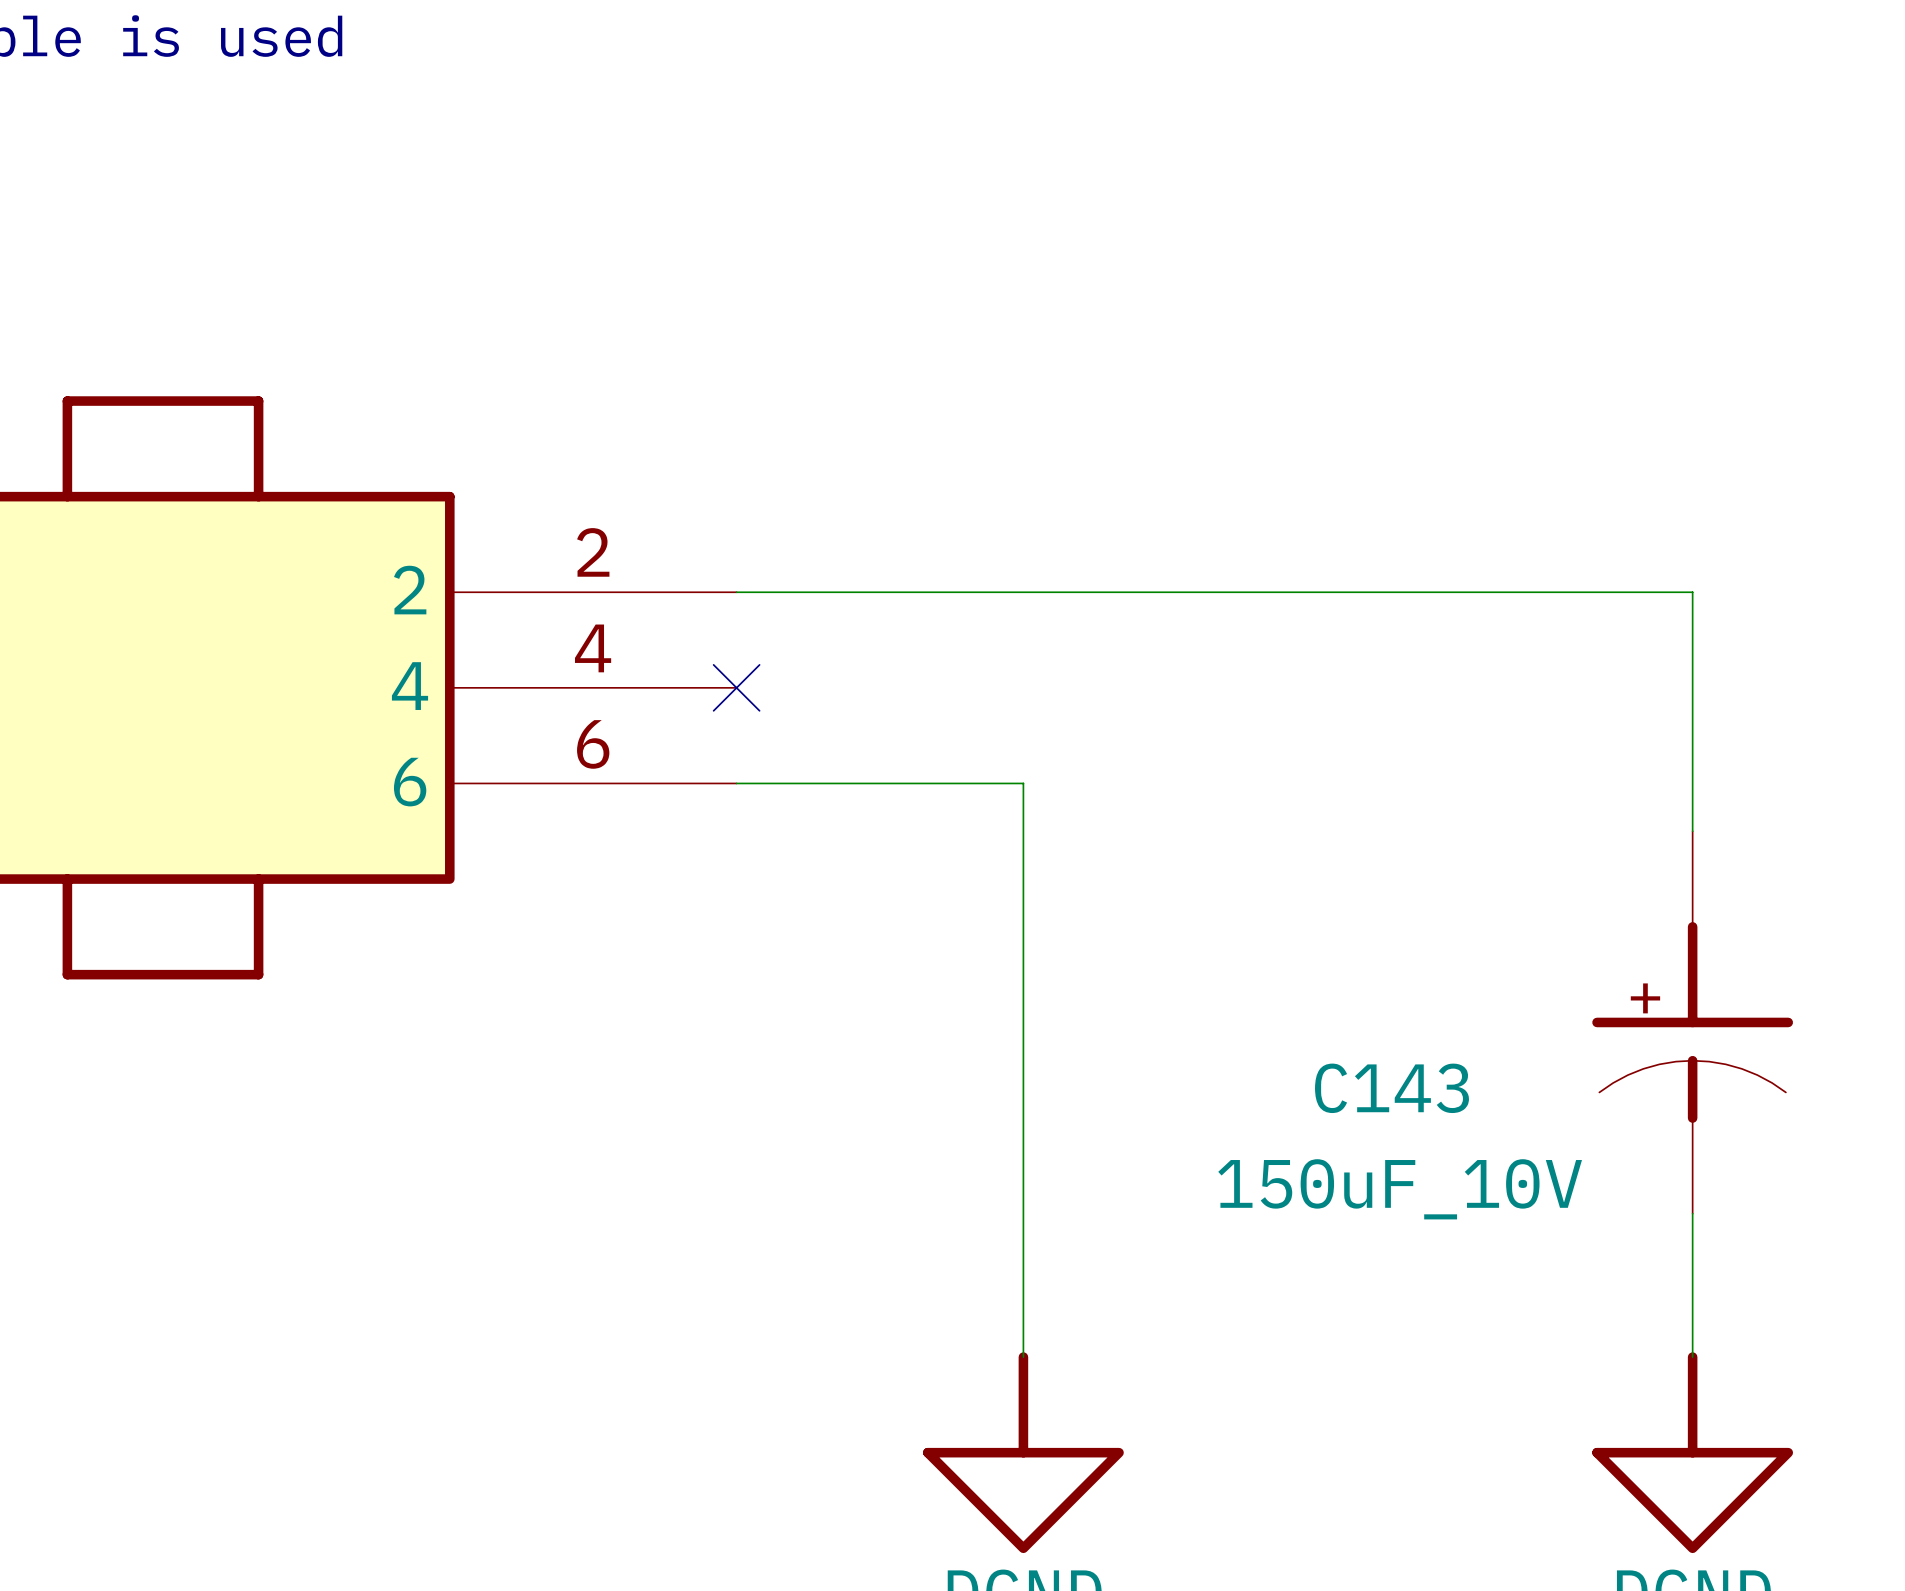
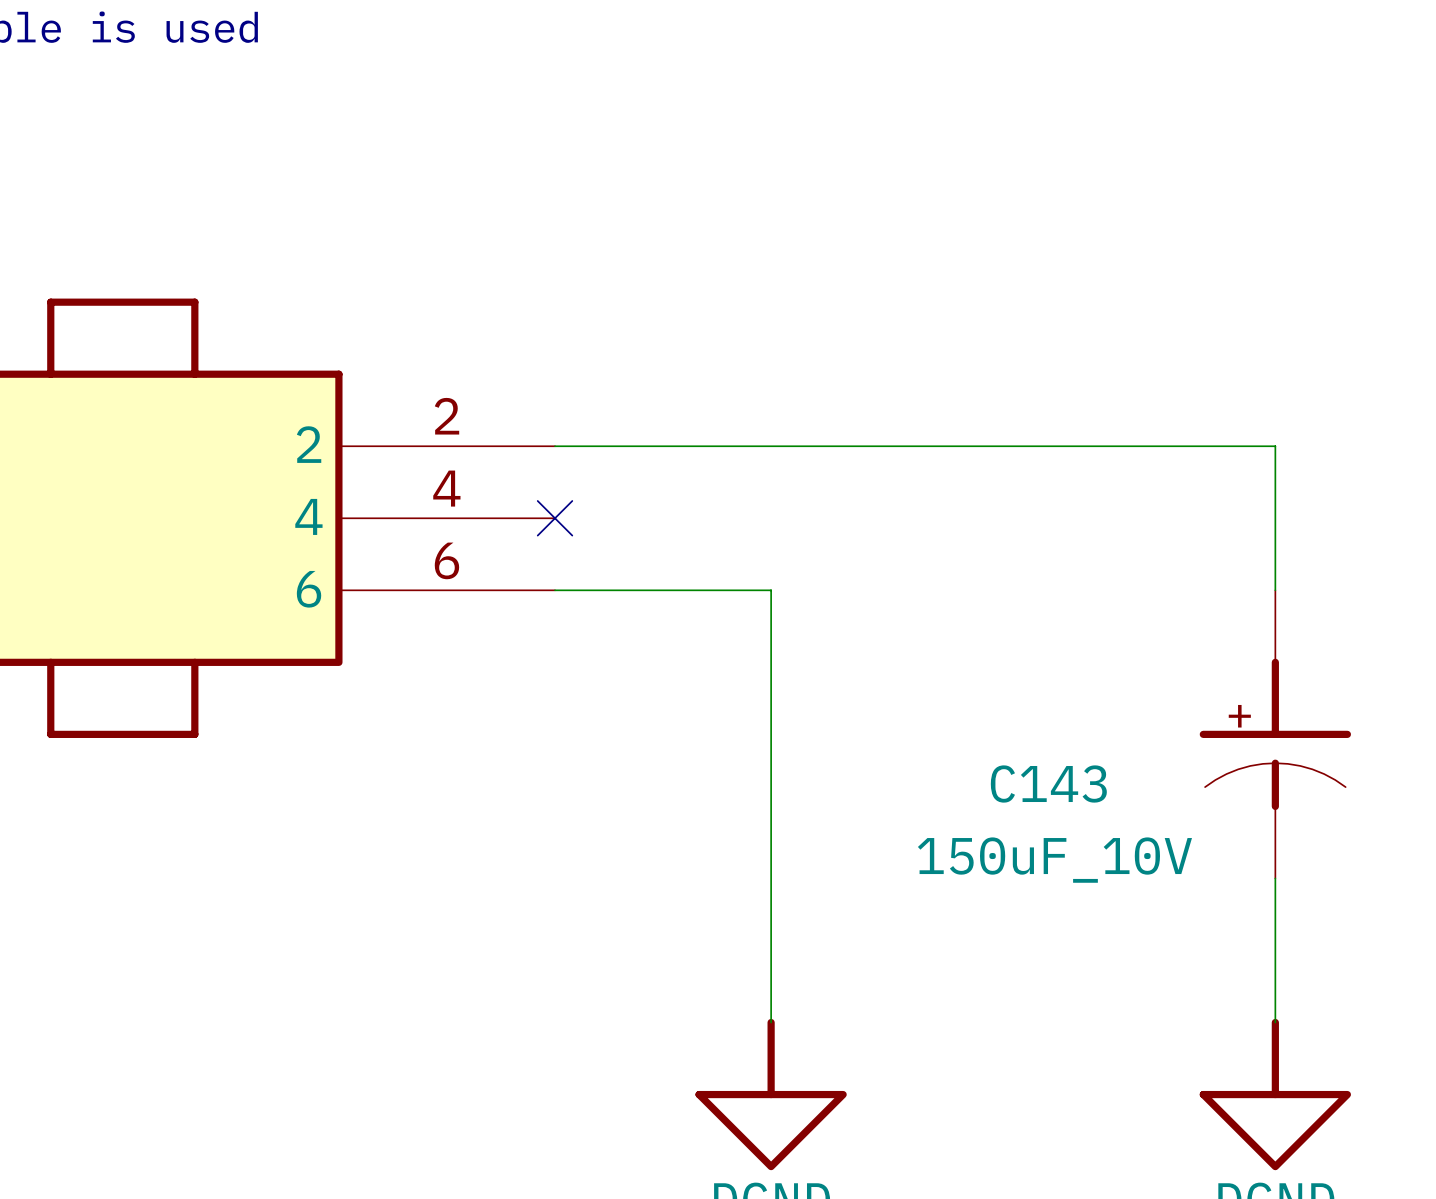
C143 position: (1692, 1022) -> (1275, 734)

